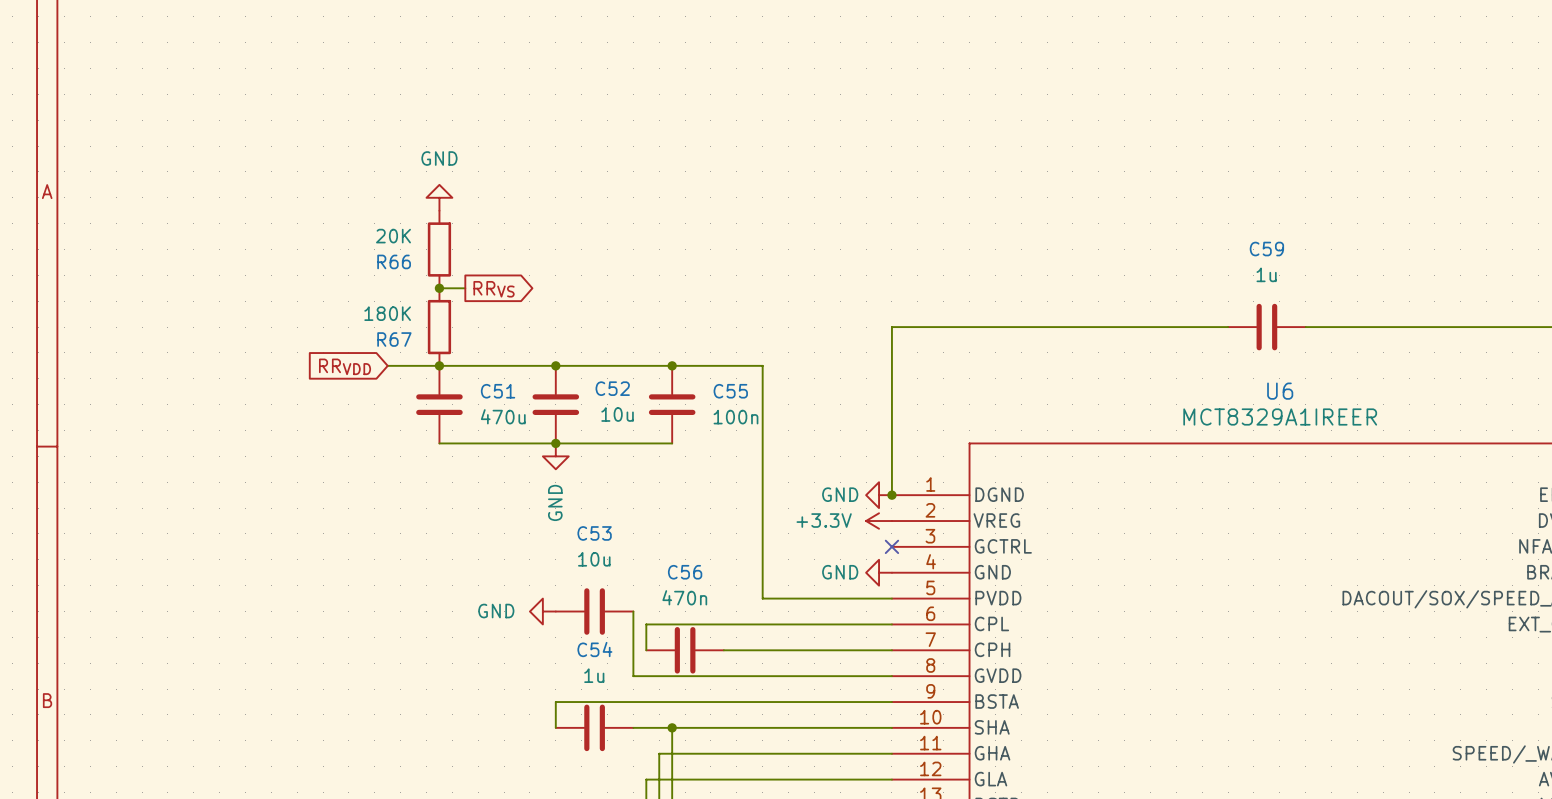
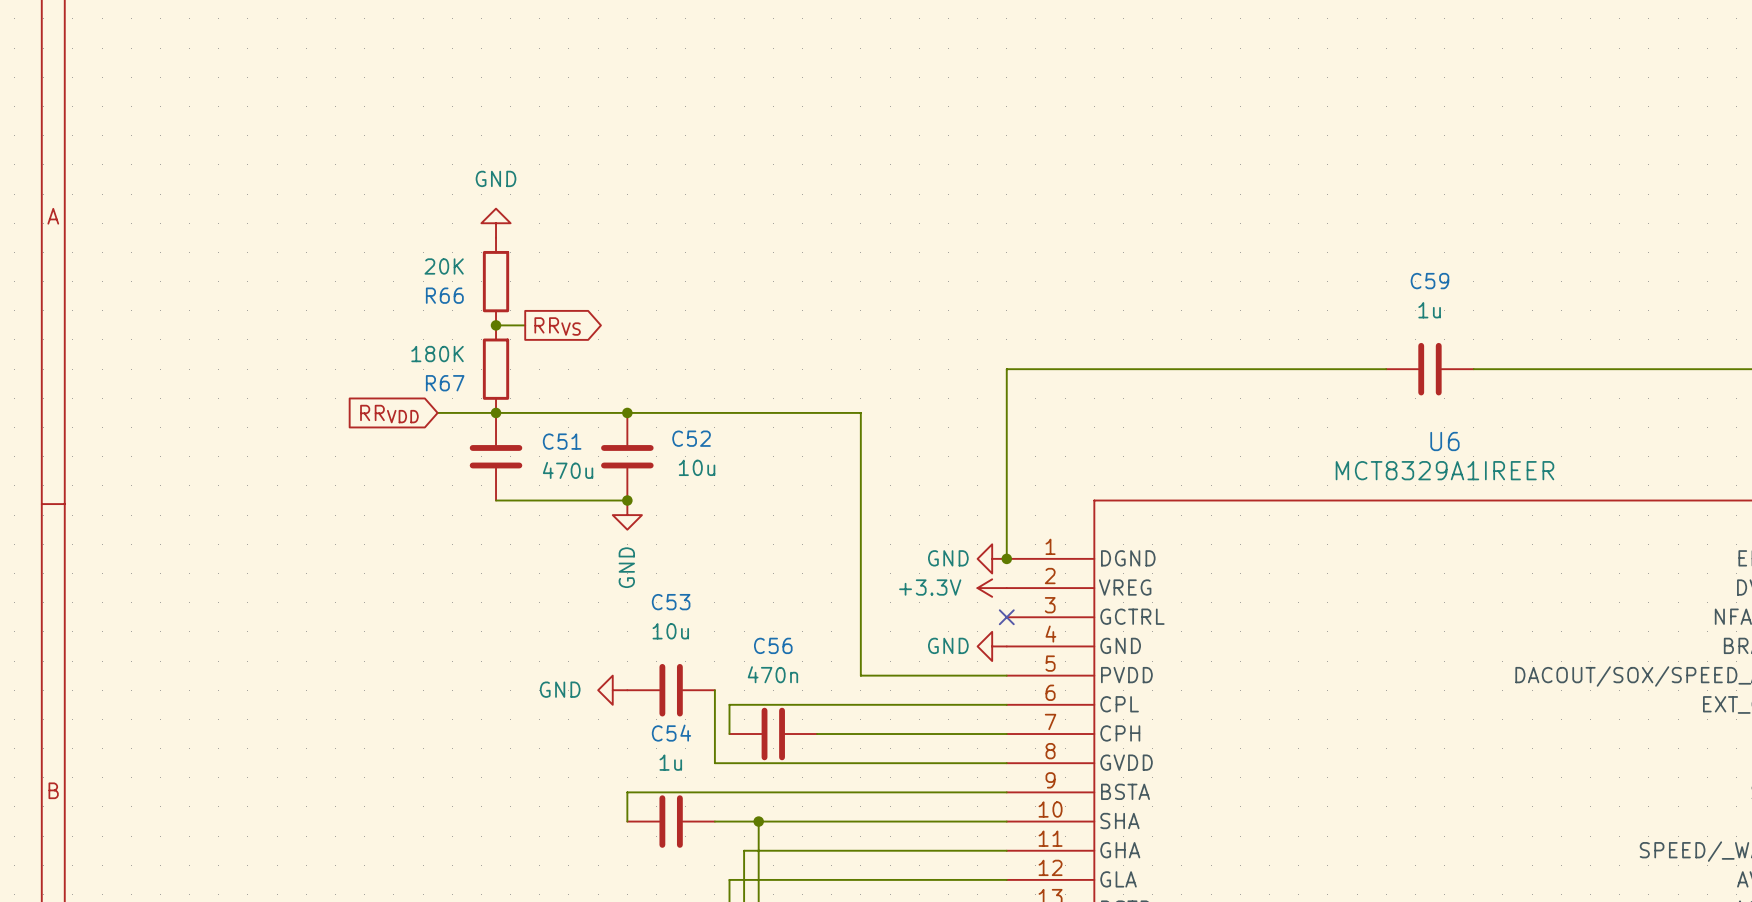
junction: (672, 365) -> none
C55: 100n (672, 404) -> none
wire: (555, 443) (672, 443) -> none

